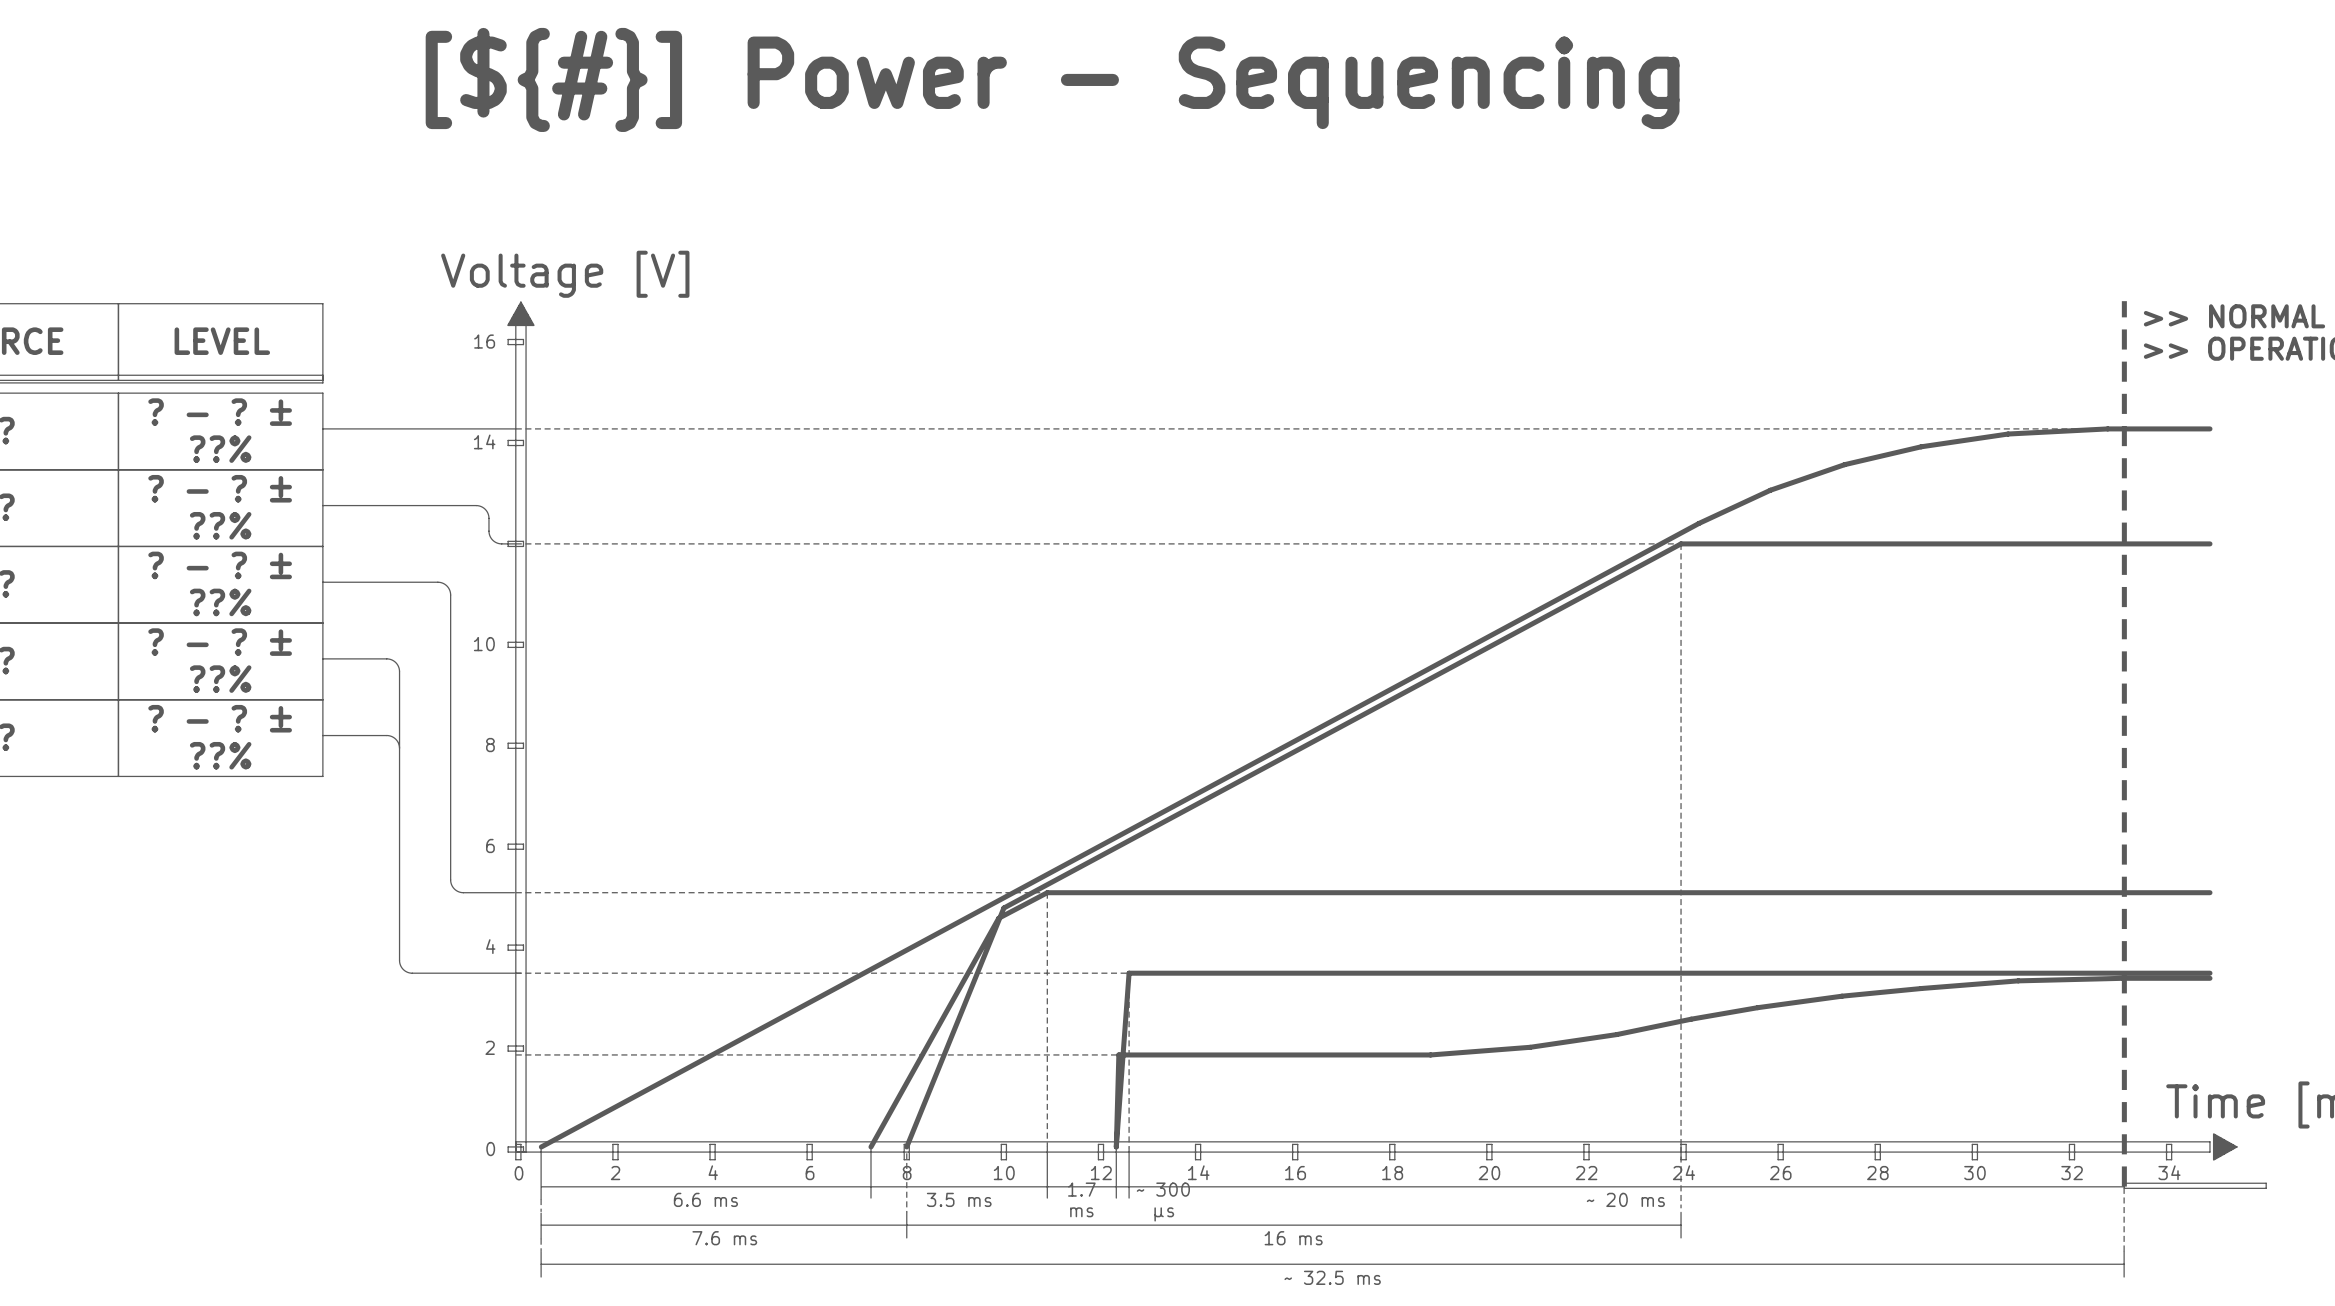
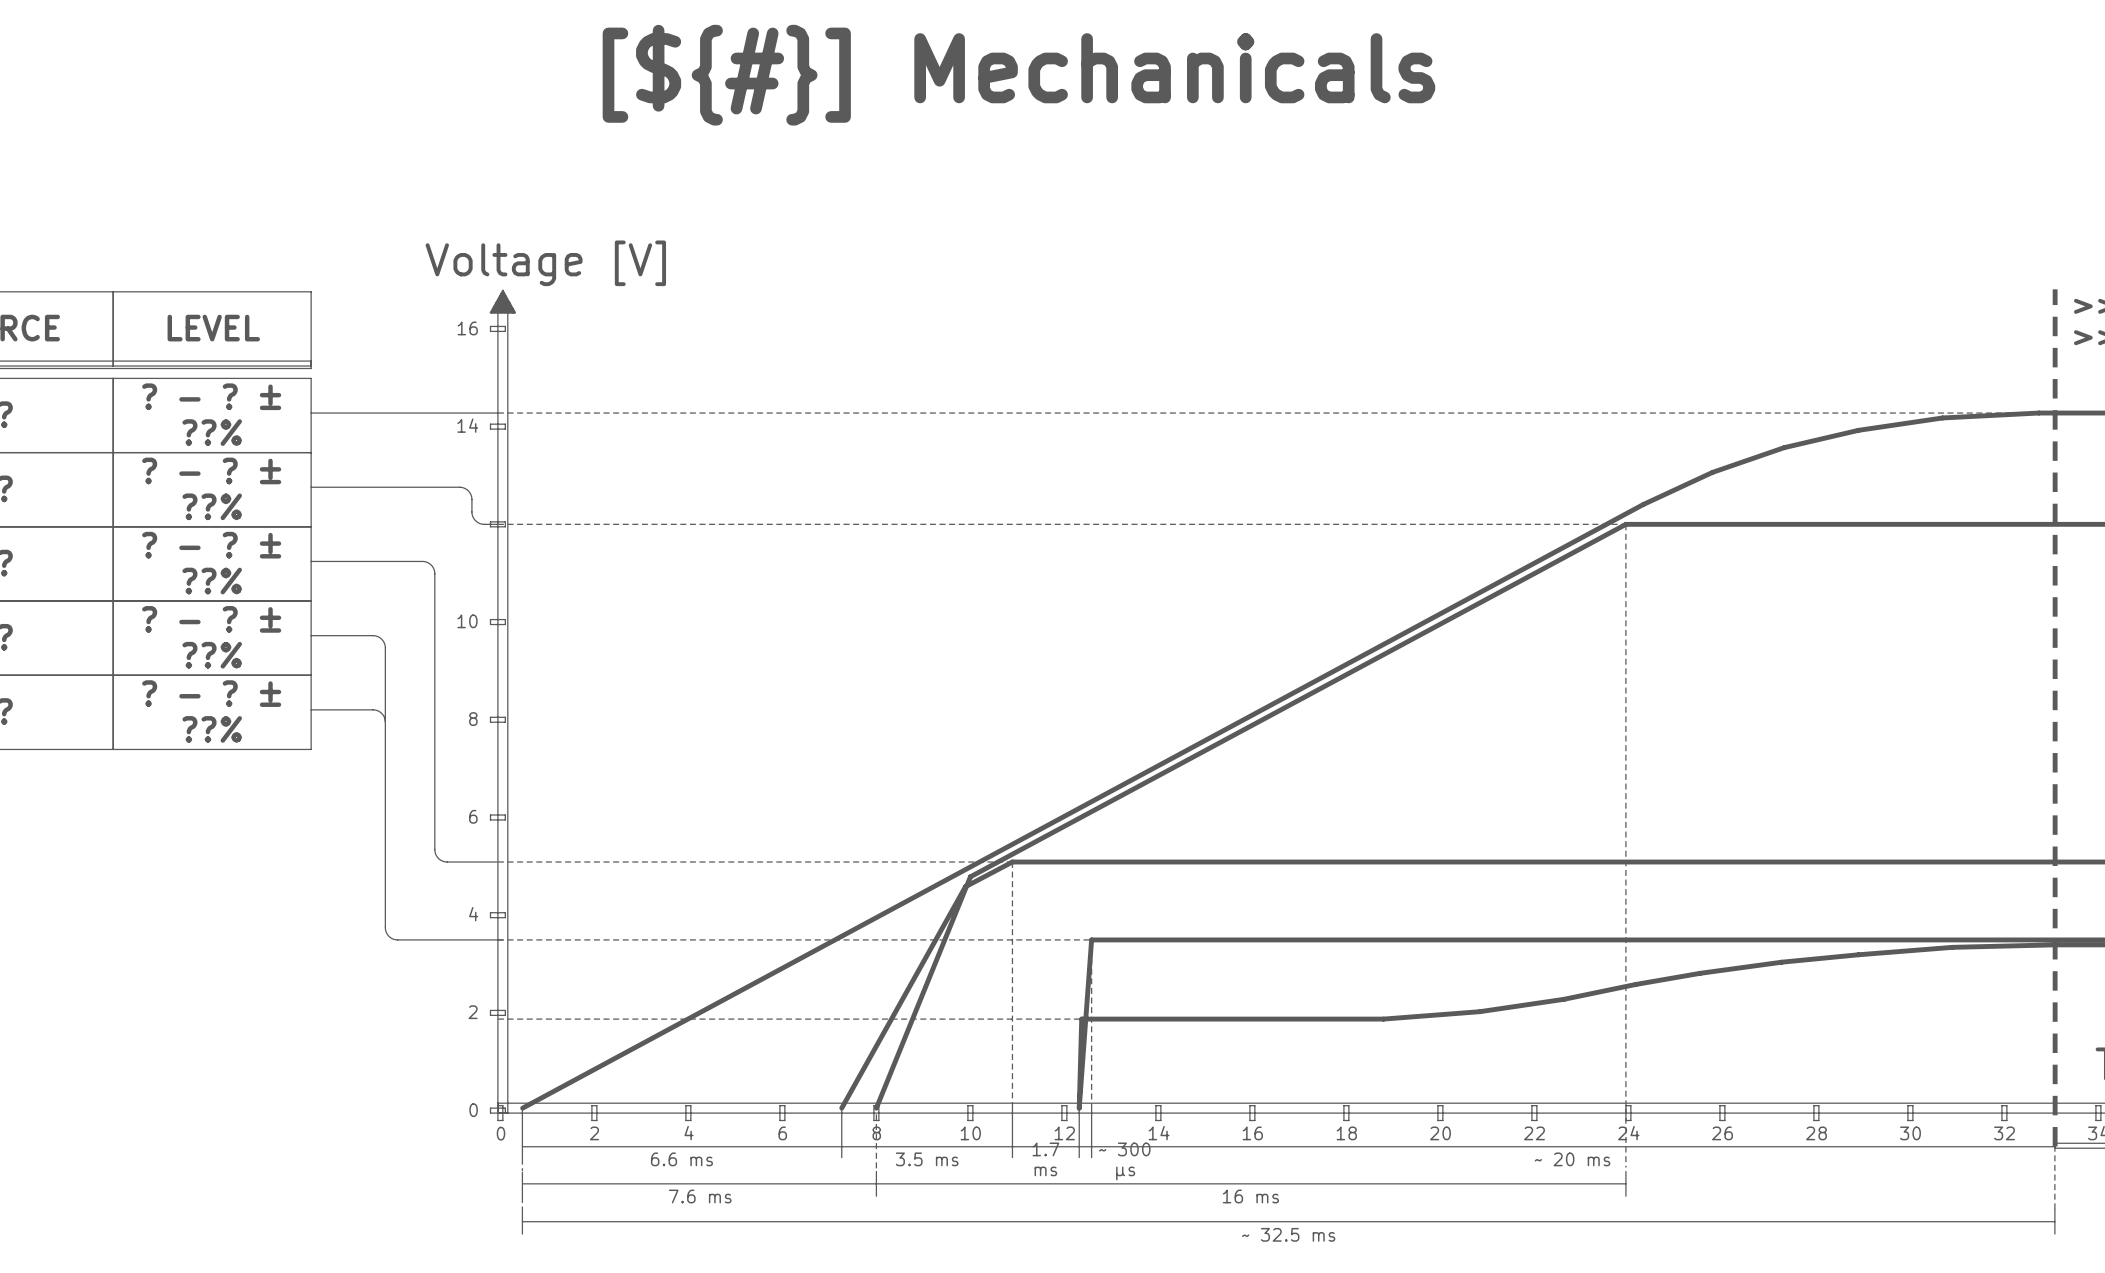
text: [${#}] Power - Sequencing (1052, 79) -> [${#}] Mechanicals (1018, 75)

